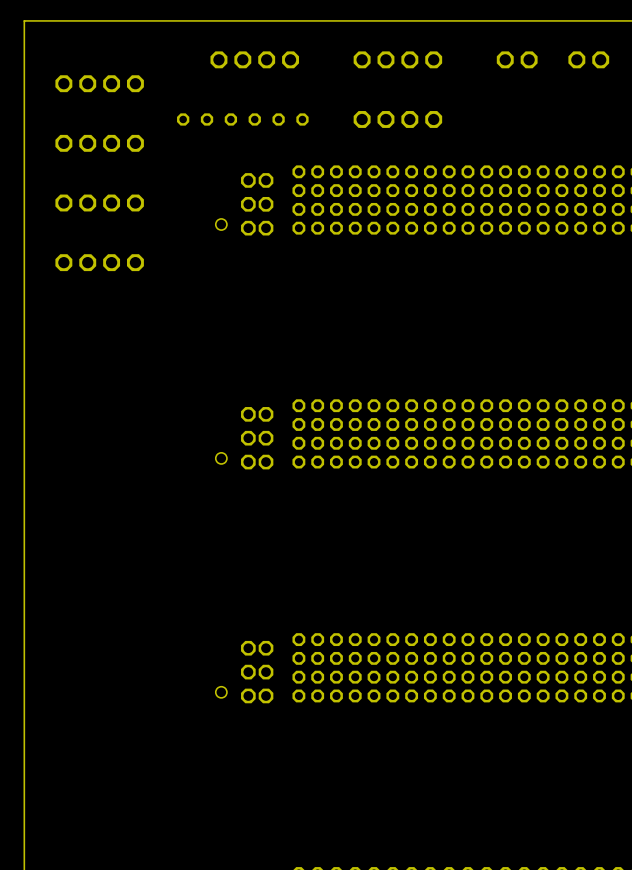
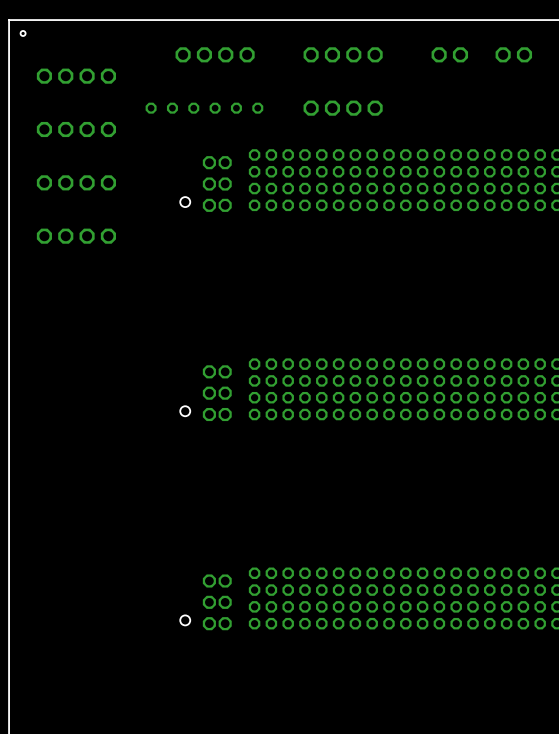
hole: none -> (23, 33)

